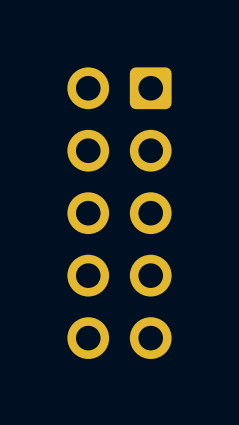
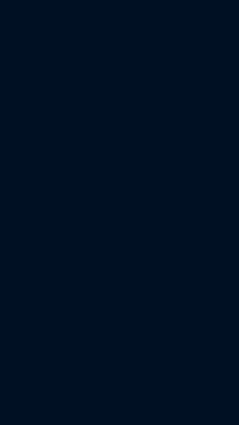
part: (119, 213) -> none

